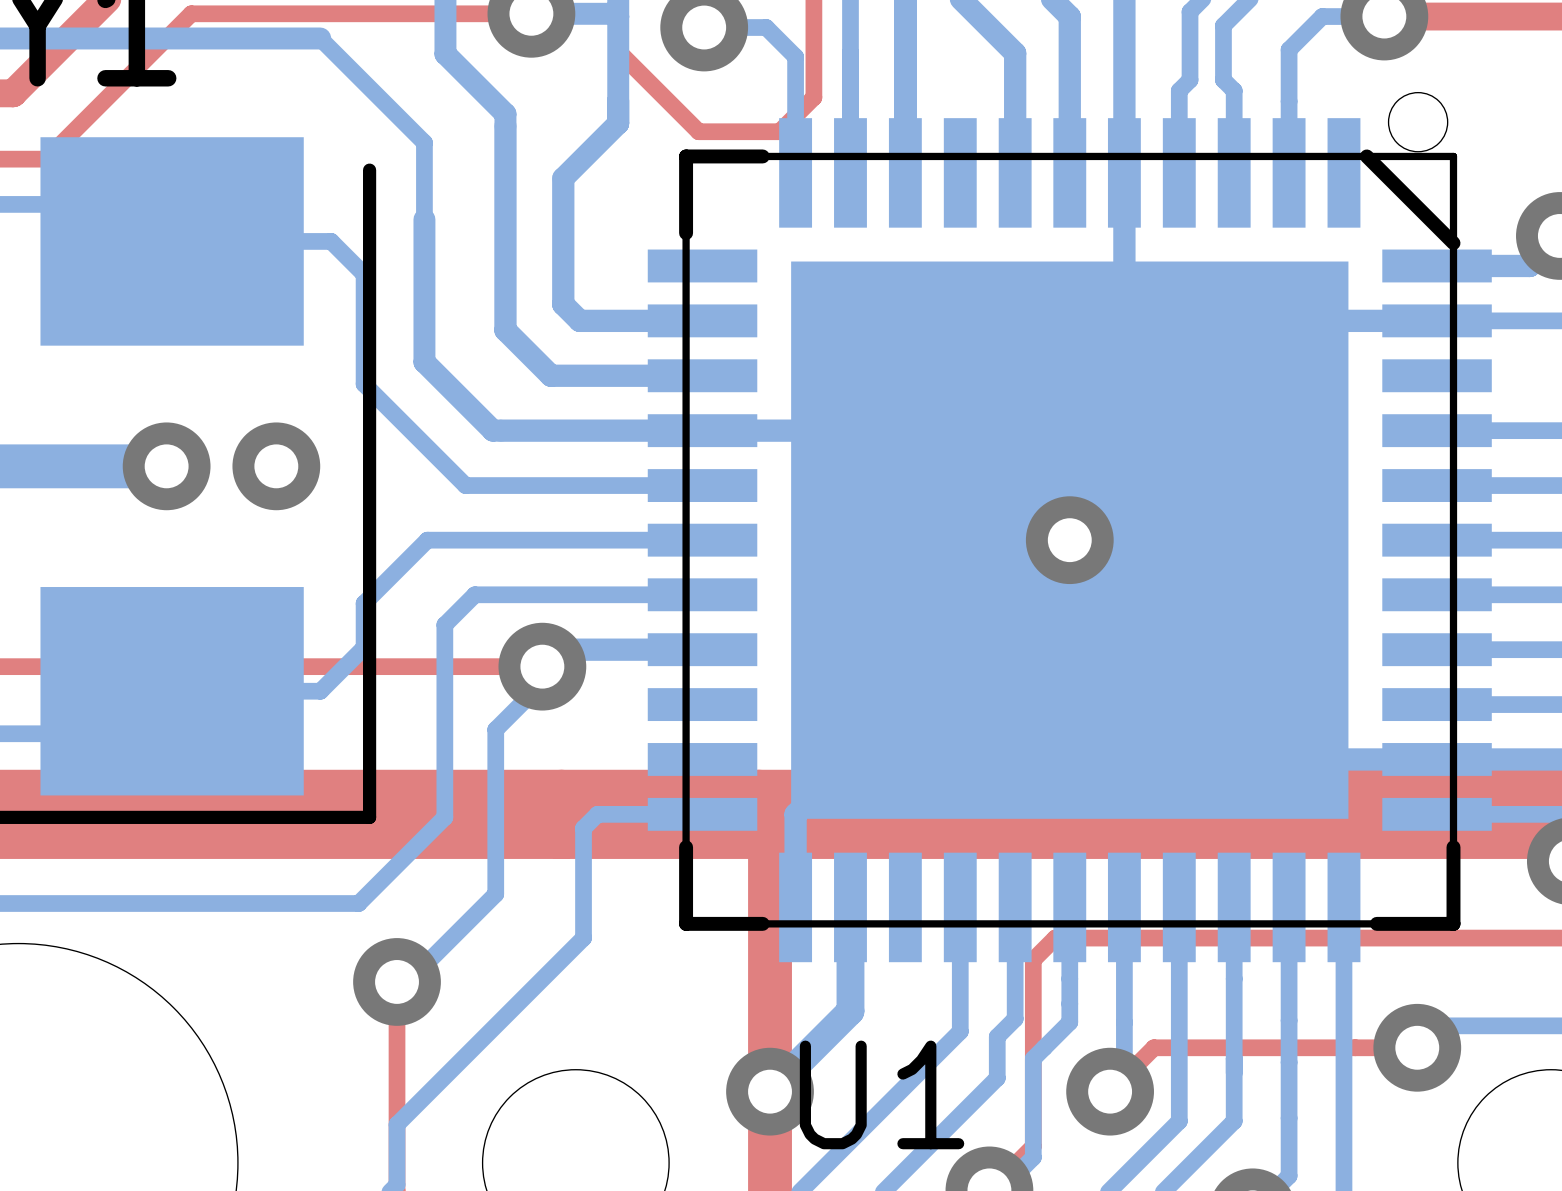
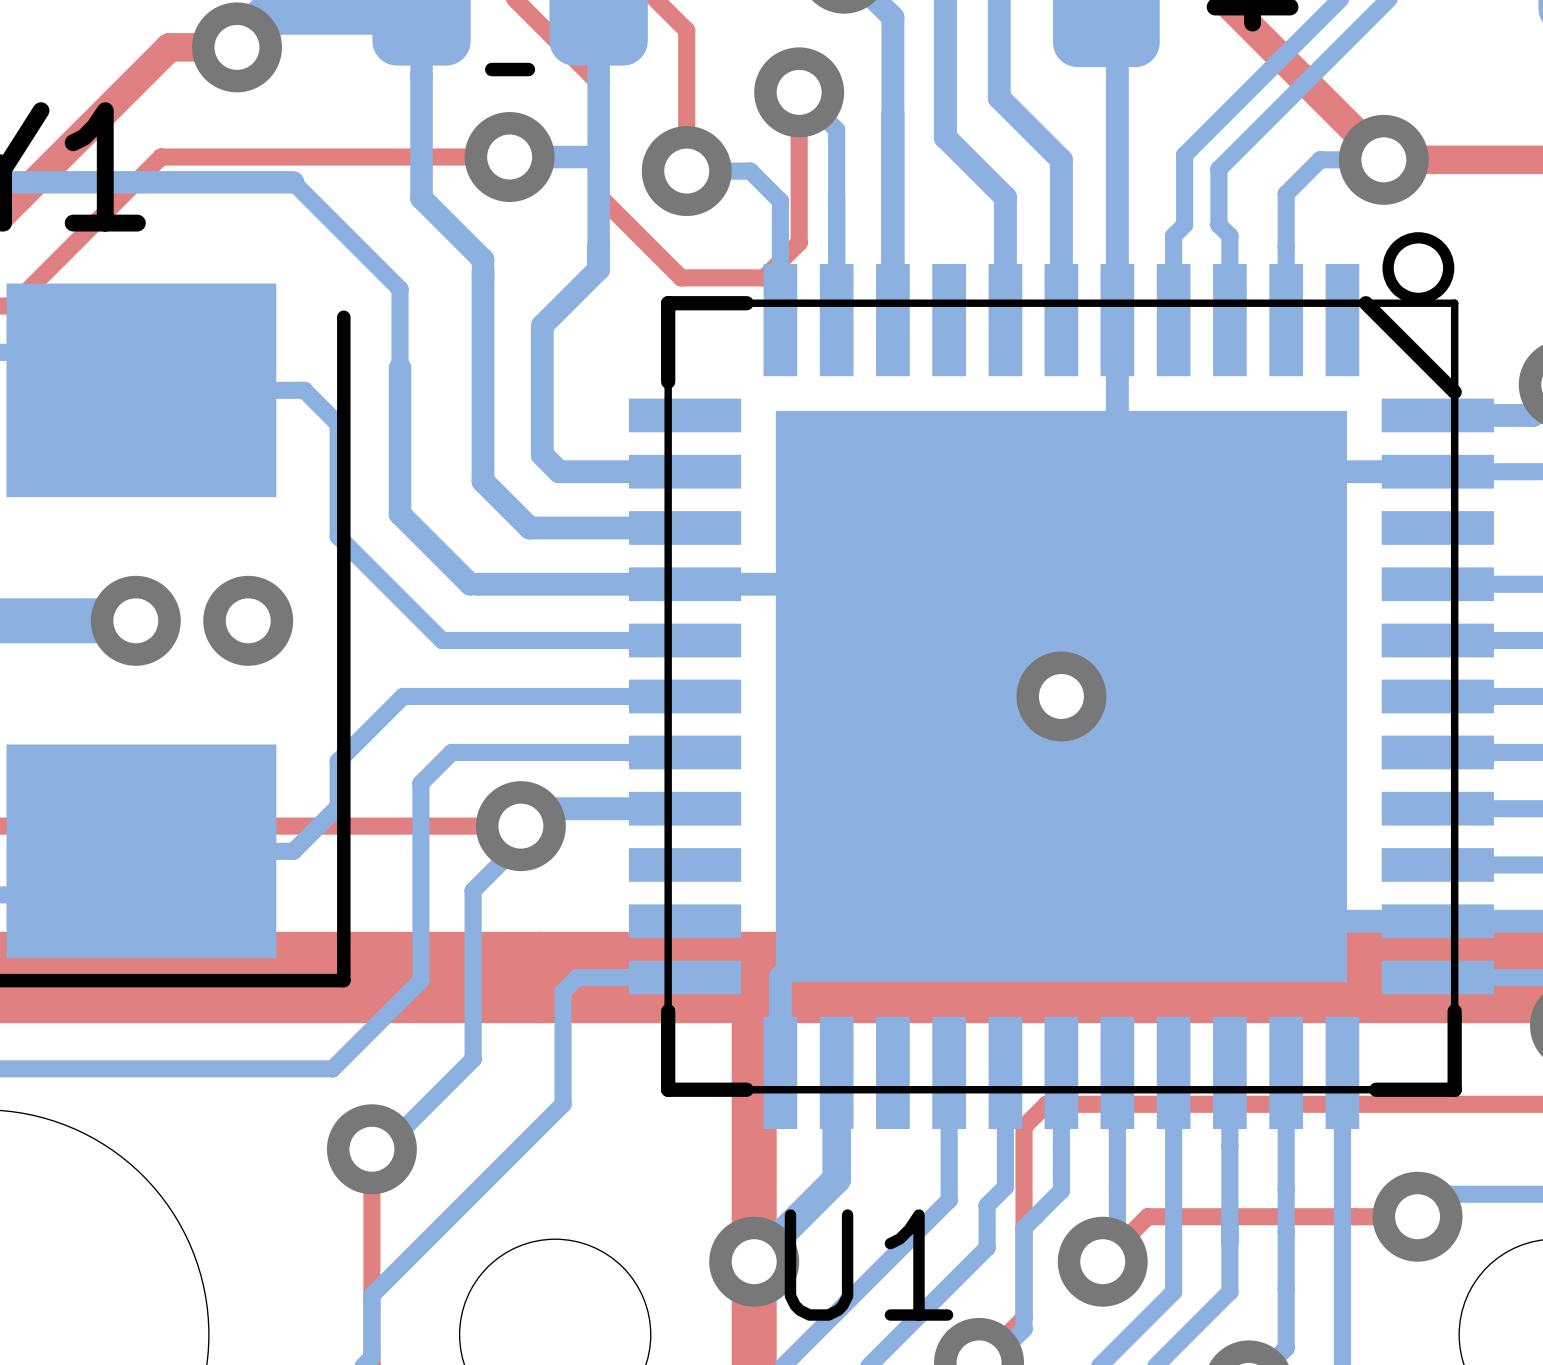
U1 footprint: [647, 92, 1492, 963] -> [628, 232, 1494, 1130]

